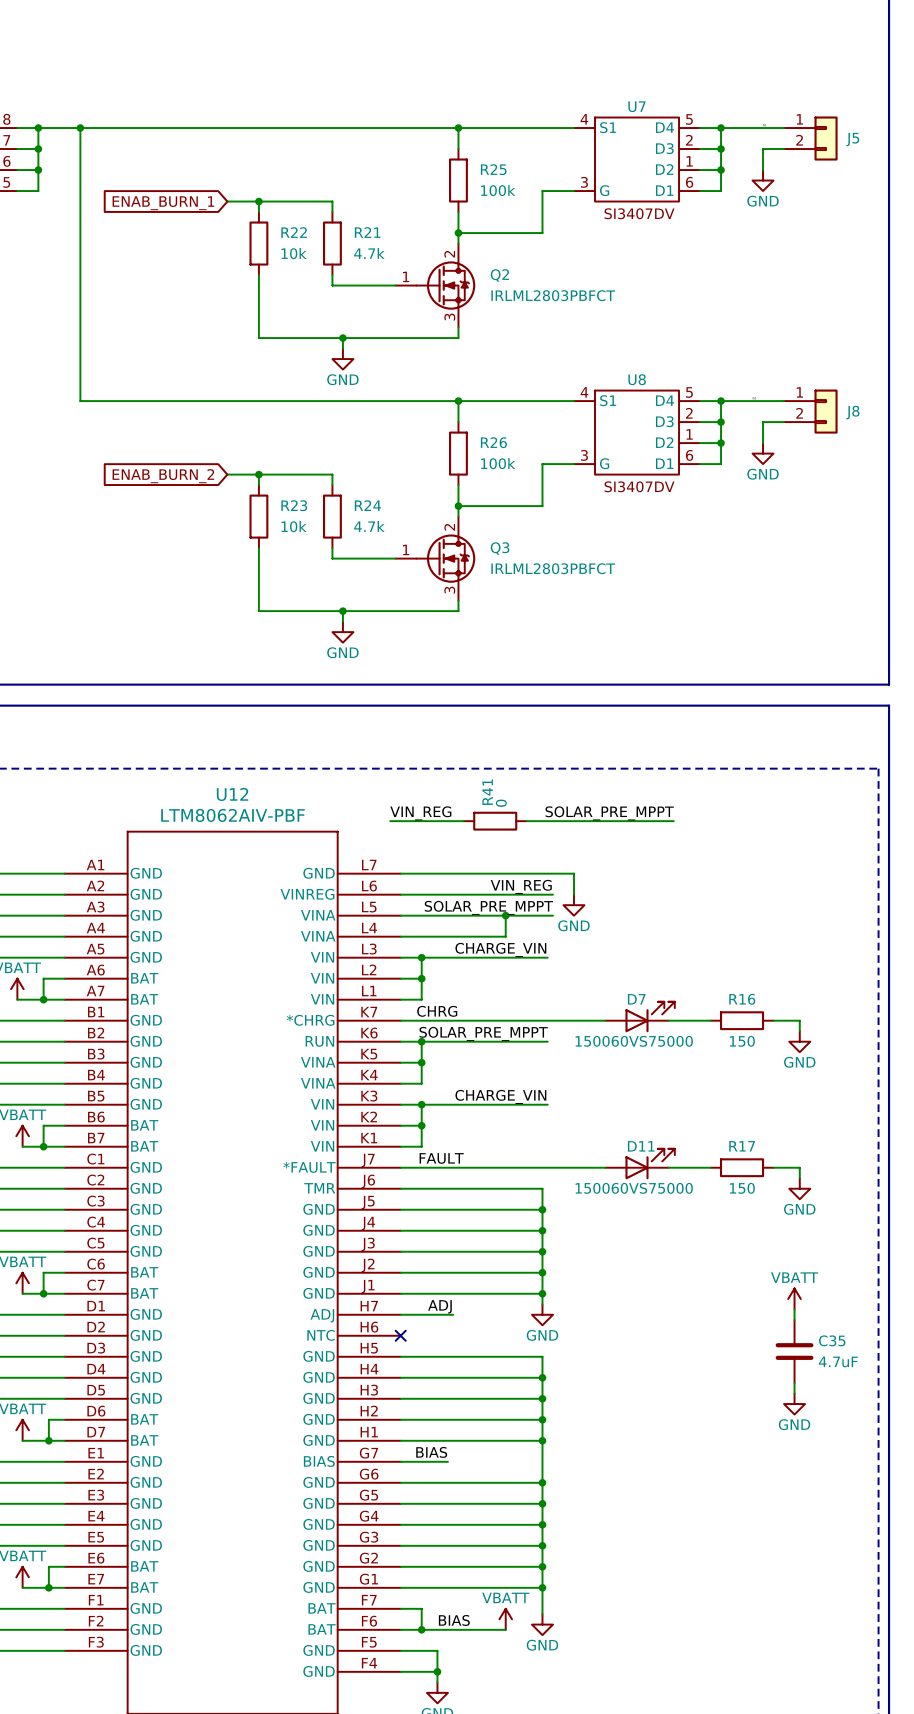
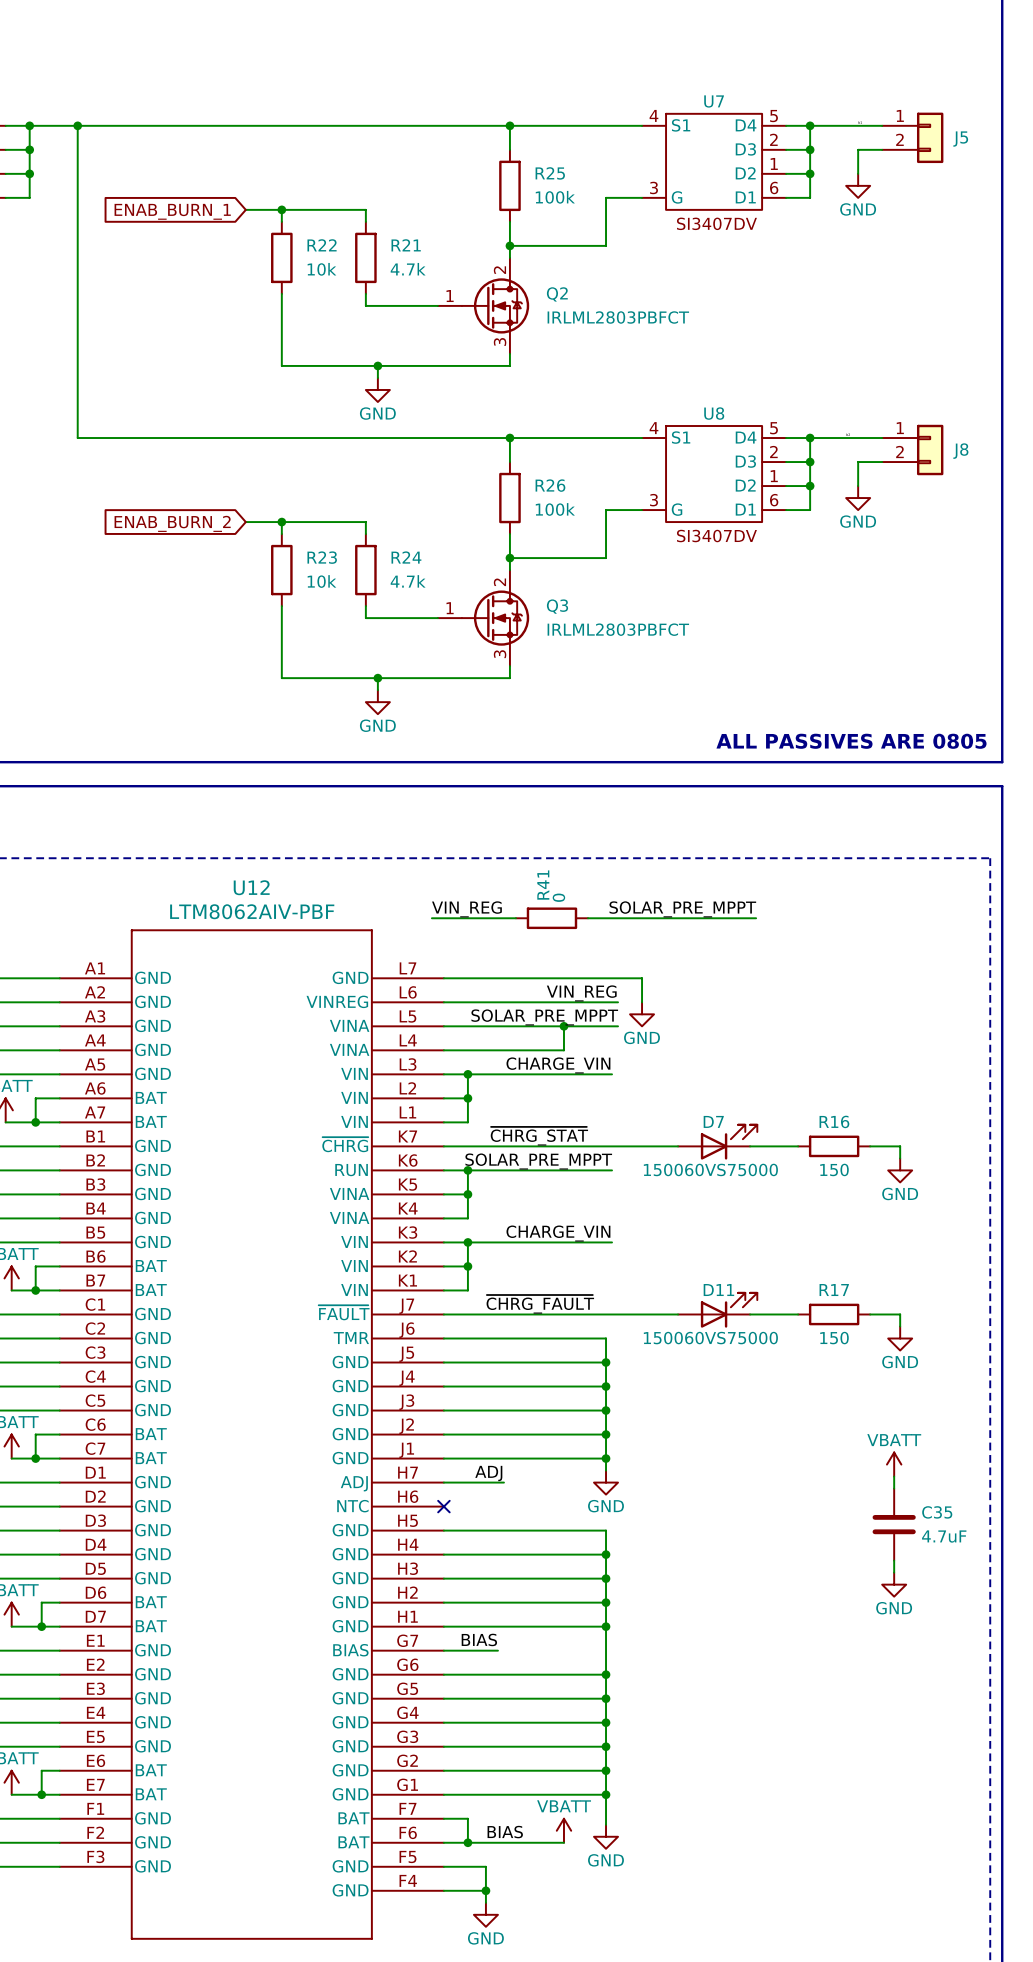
text: none -> ALL PASSIVES ARE 0805 (851, 741)
label: CHRG (437, 1011) -> none
label: none -> ~{CHRG_STAT} (539, 1136)
U12 pin name: *CHRG (310, 1020) -> ~{CHRG} (345, 1144)
label: FAULT (441, 1158) -> none
label: none -> ~{CHRG_FAULT} (540, 1304)
U12 pin name: *FAULT (309, 1167) -> ~{FAULT} (344, 1312)

